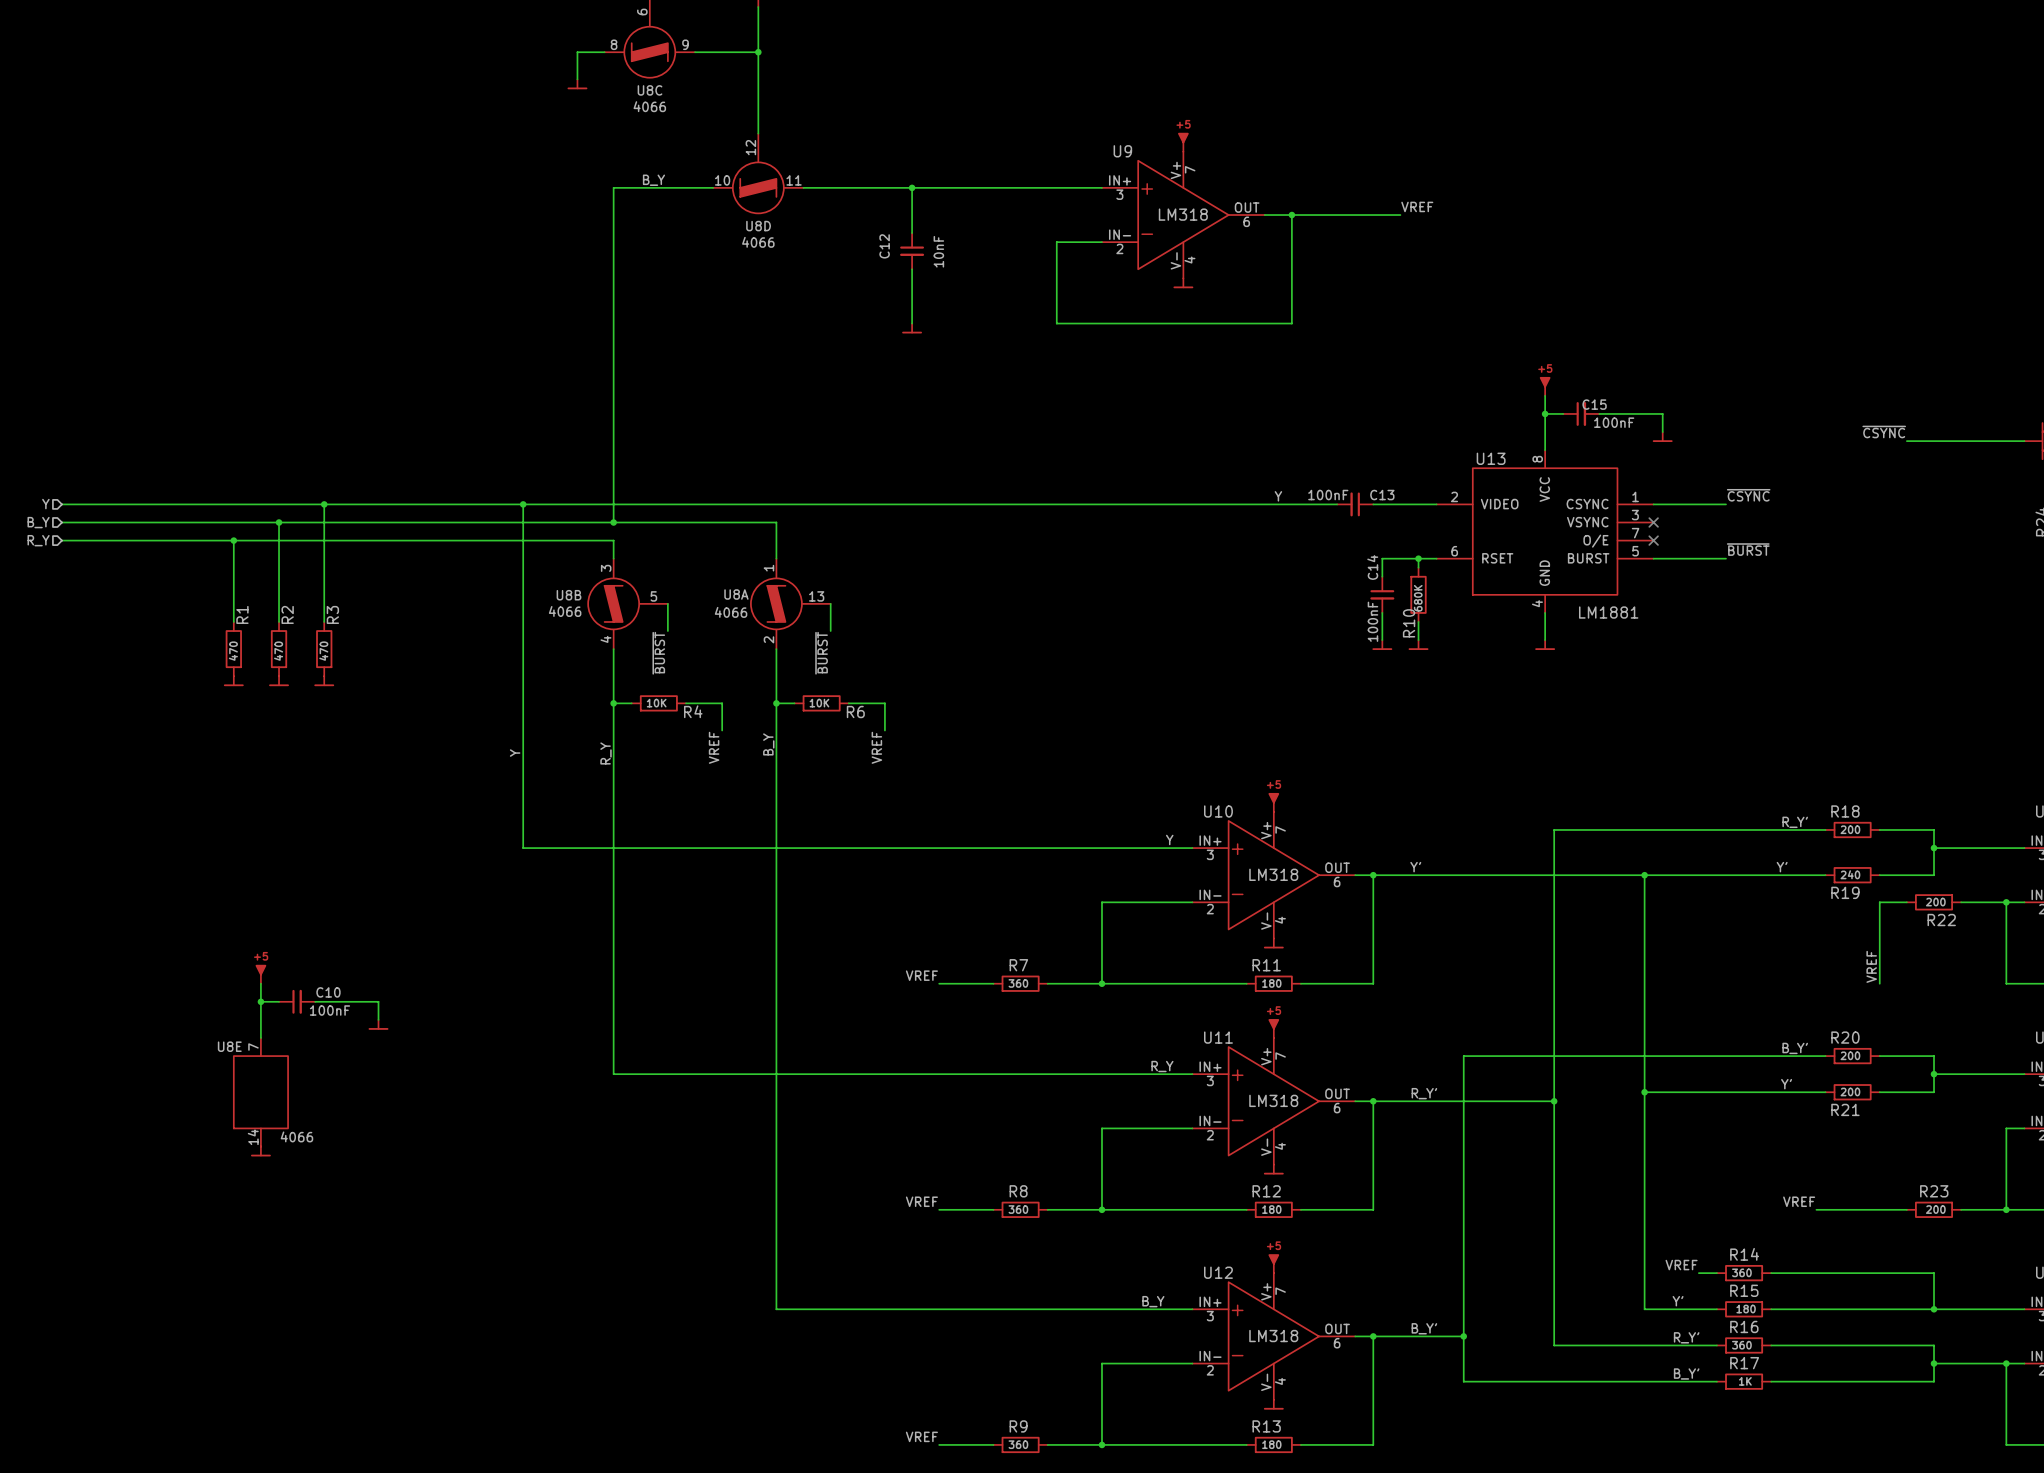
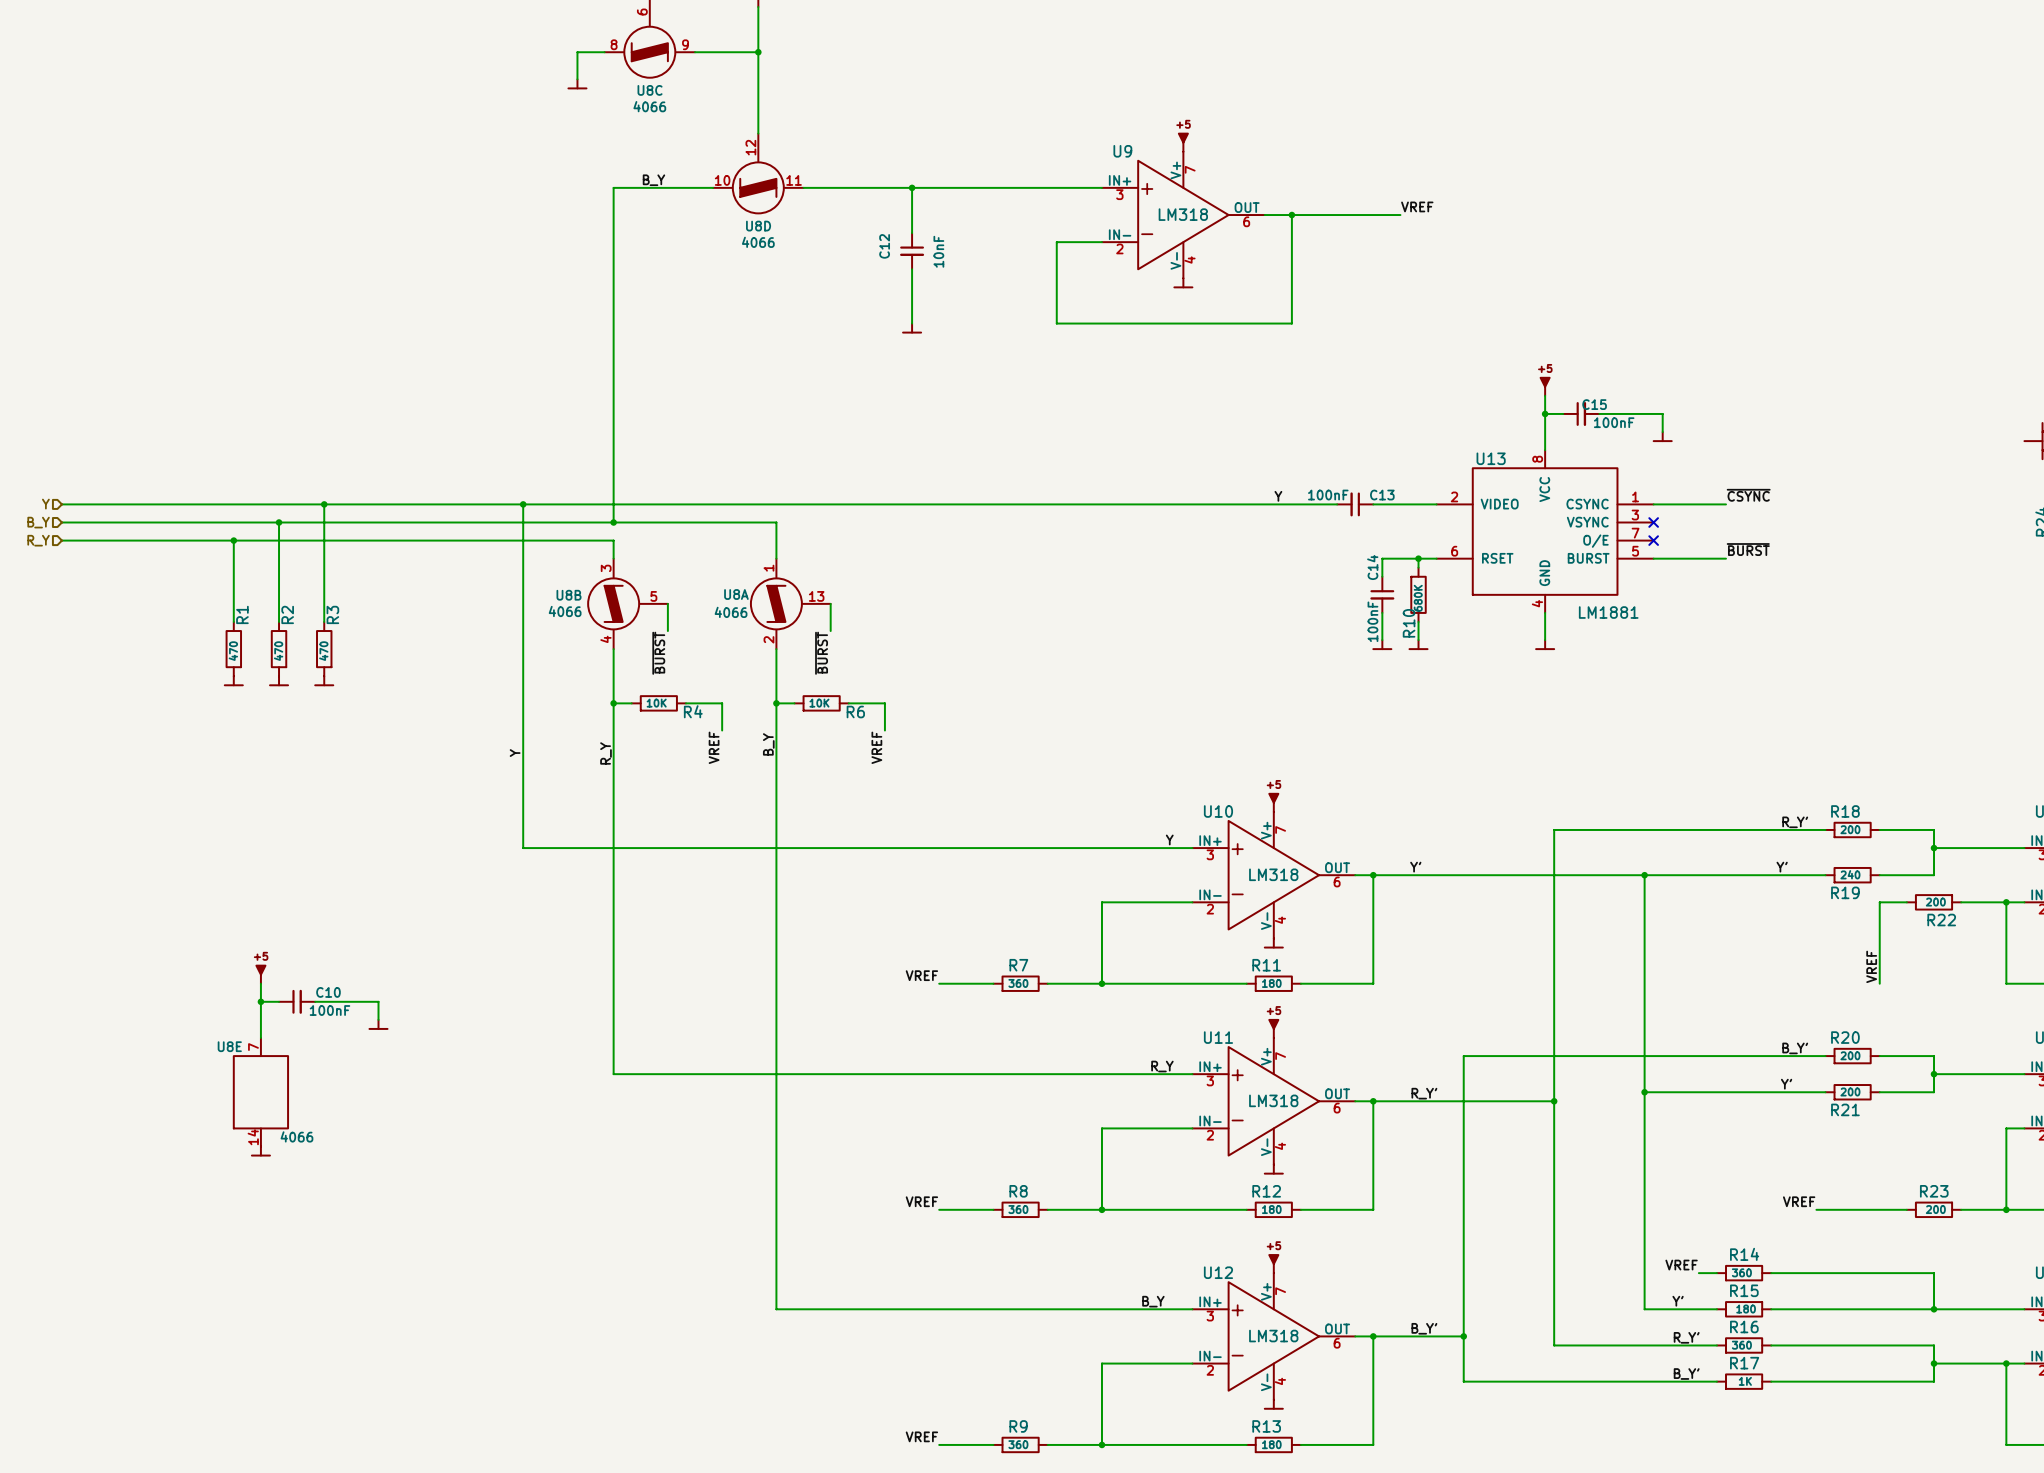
label: ~{CSYNC} (1884, 431) -> none
wire: (1906, 441) (2024, 441) -> none

